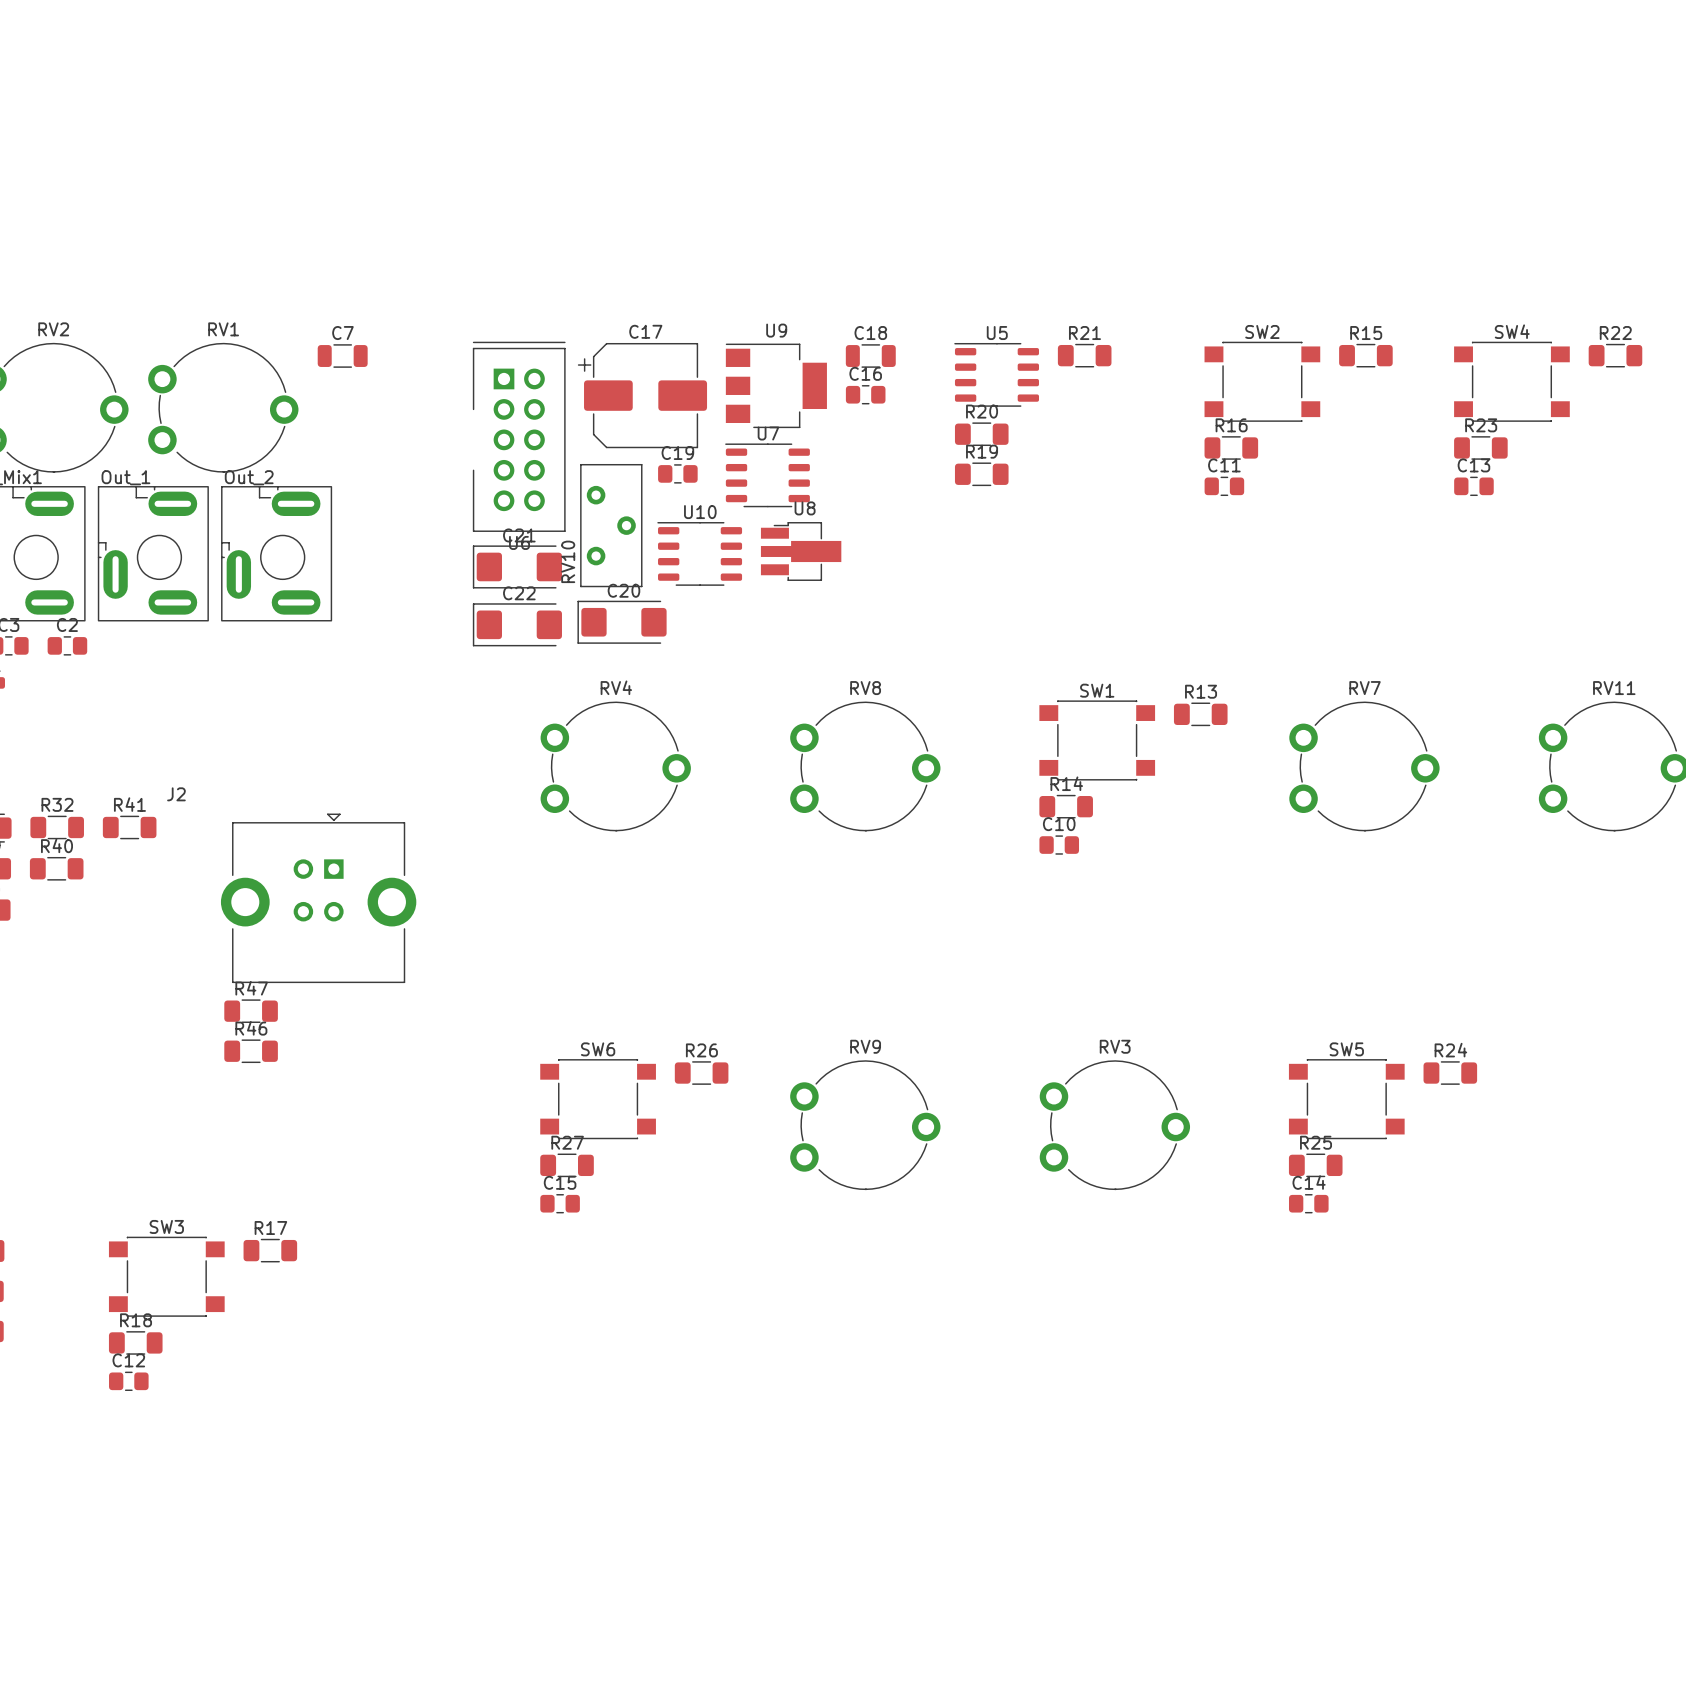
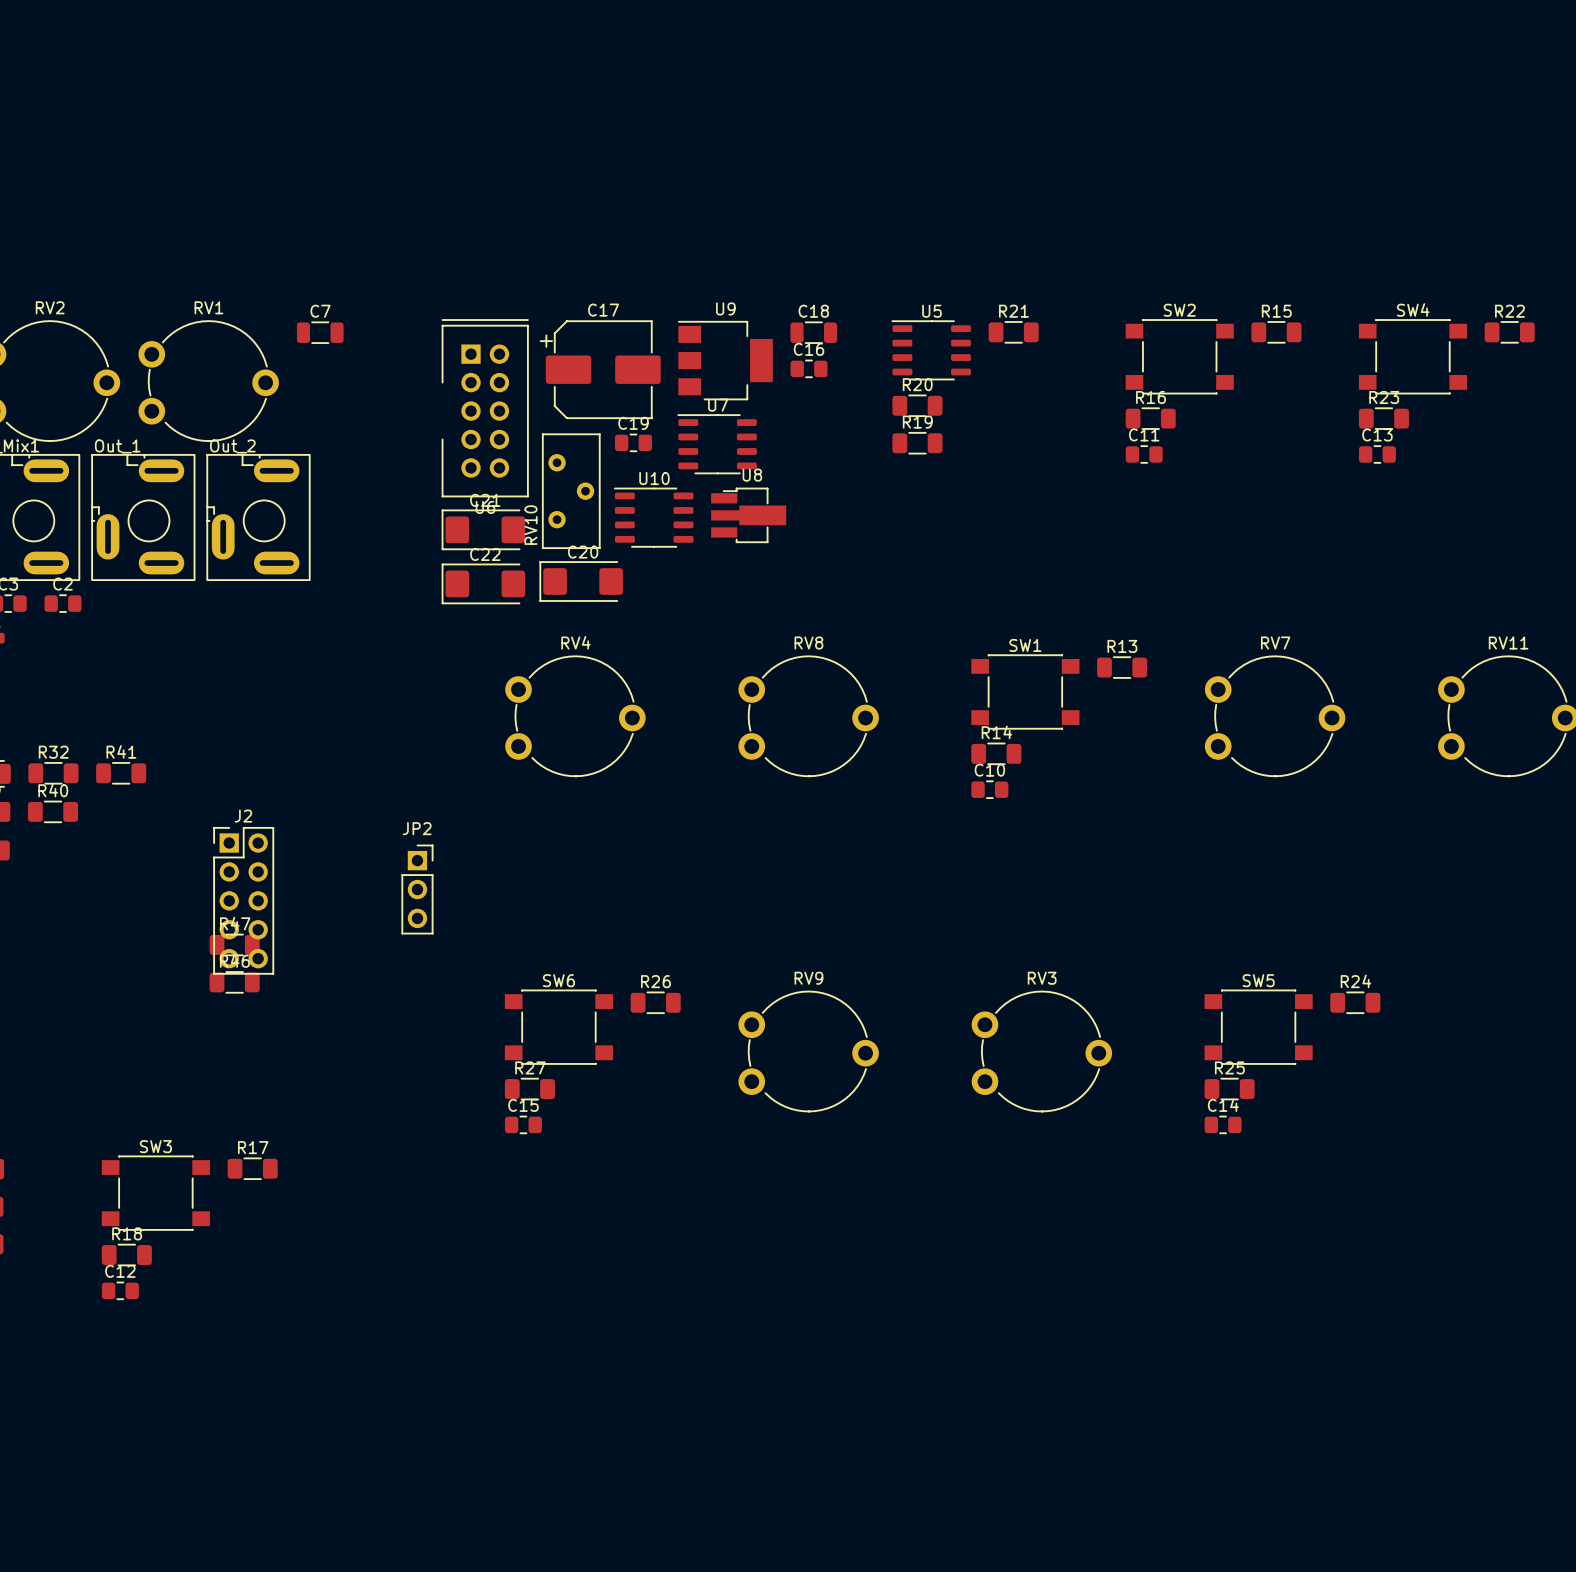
J2 name position: J2 (176, 794) -> J2 (243, 816)
J2 footprint: [220, 813, 417, 984] -> [213, 827, 274, 975]
JP2: none -> (417, 889)

